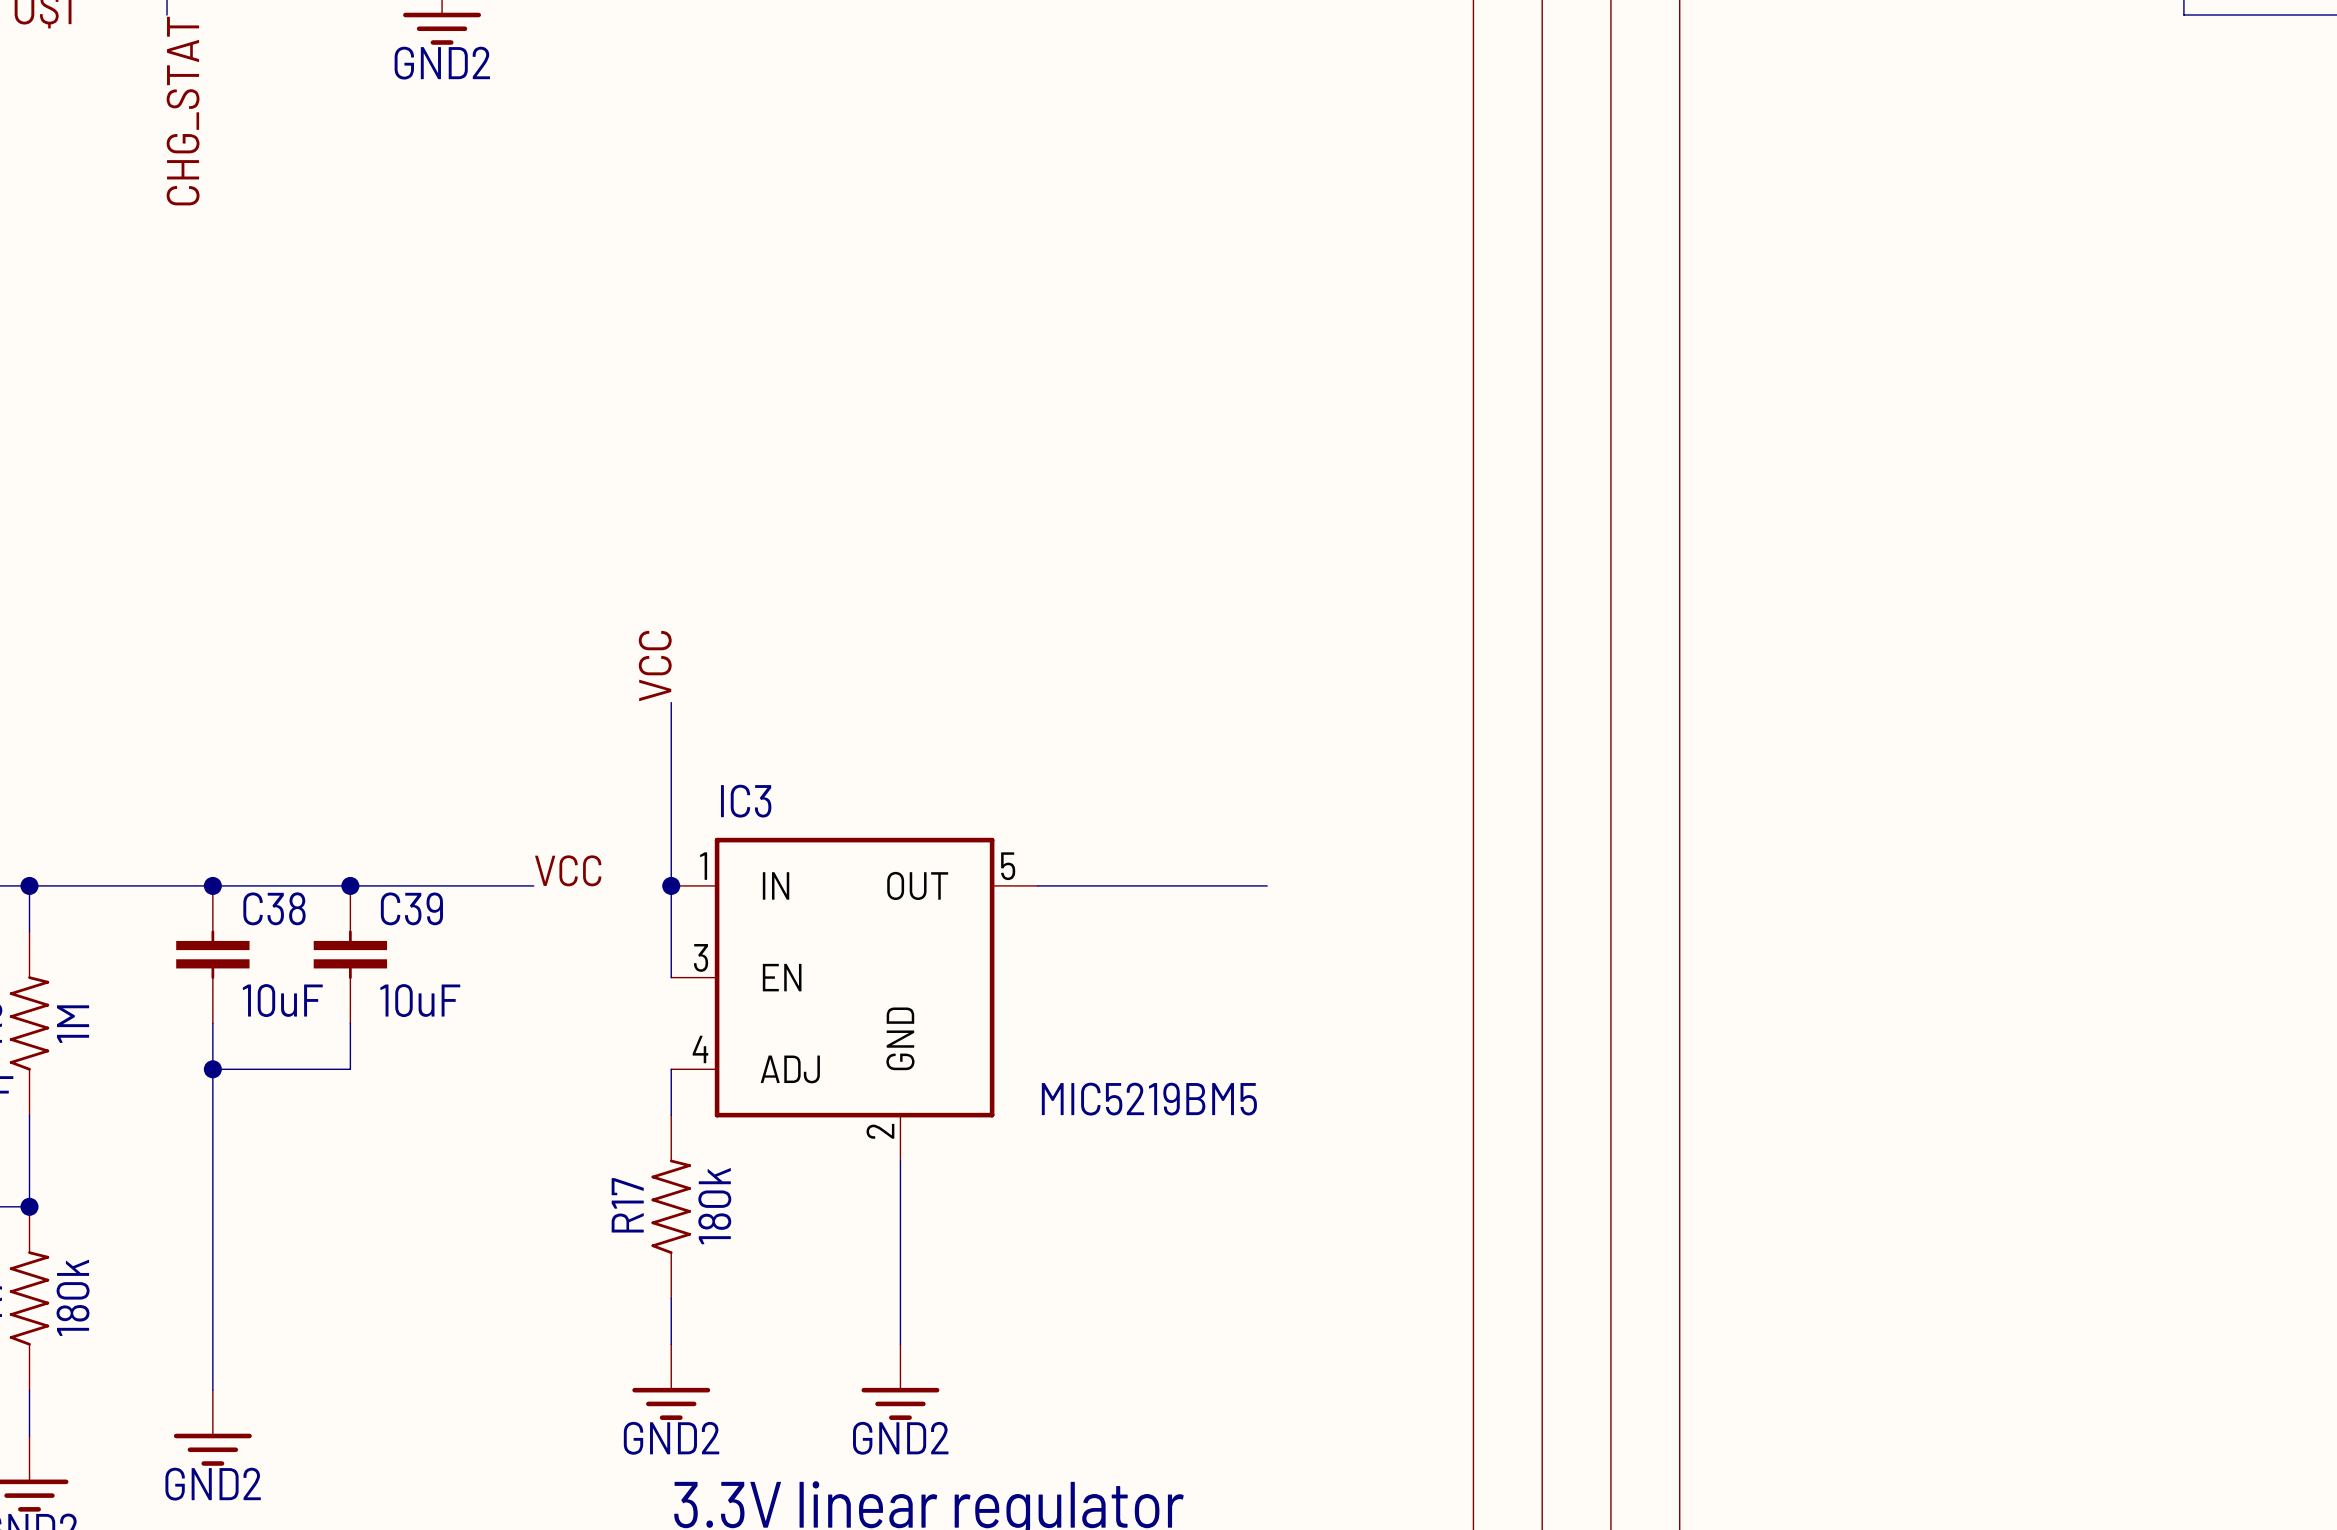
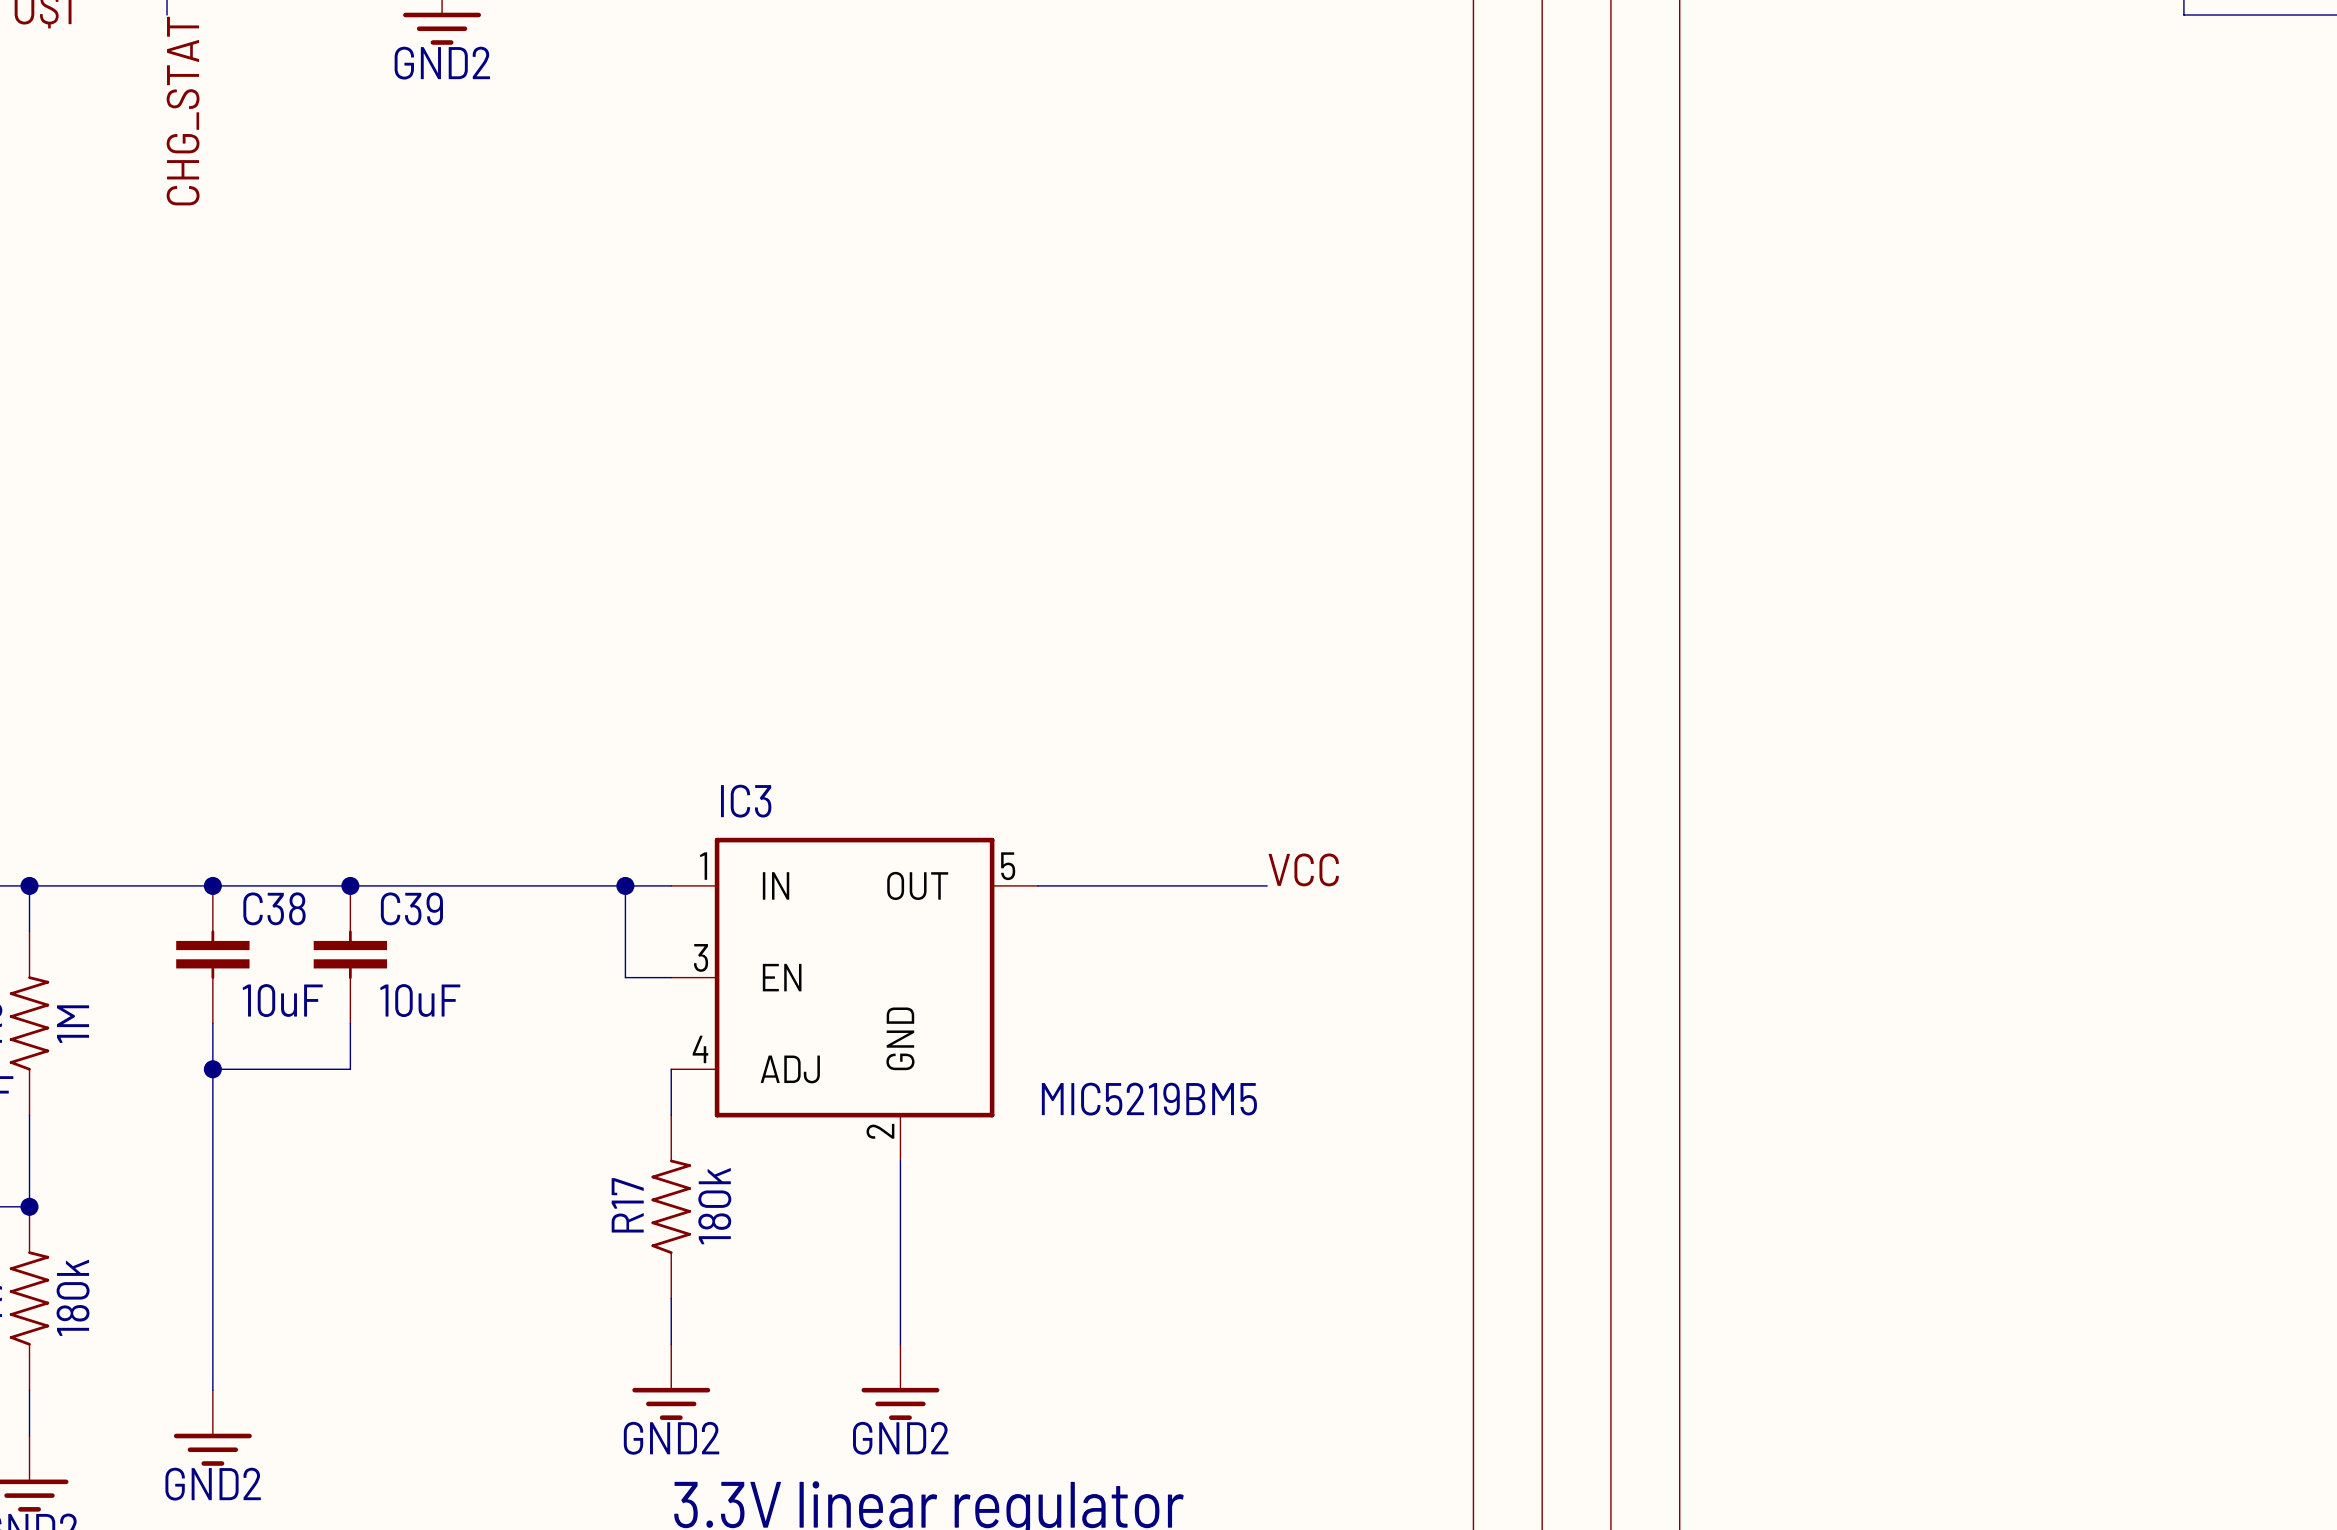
label: VCC (655, 666) -> none
wire: (671, 702) (671, 977) -> (625, 885) (625, 977) (671, 977)
label: none -> VCC (1303, 869)
label: VCC (568, 870) -> none
wire: none -> (533, 885) (671, 885)
junction position: (671, 885) -> (625, 885)

